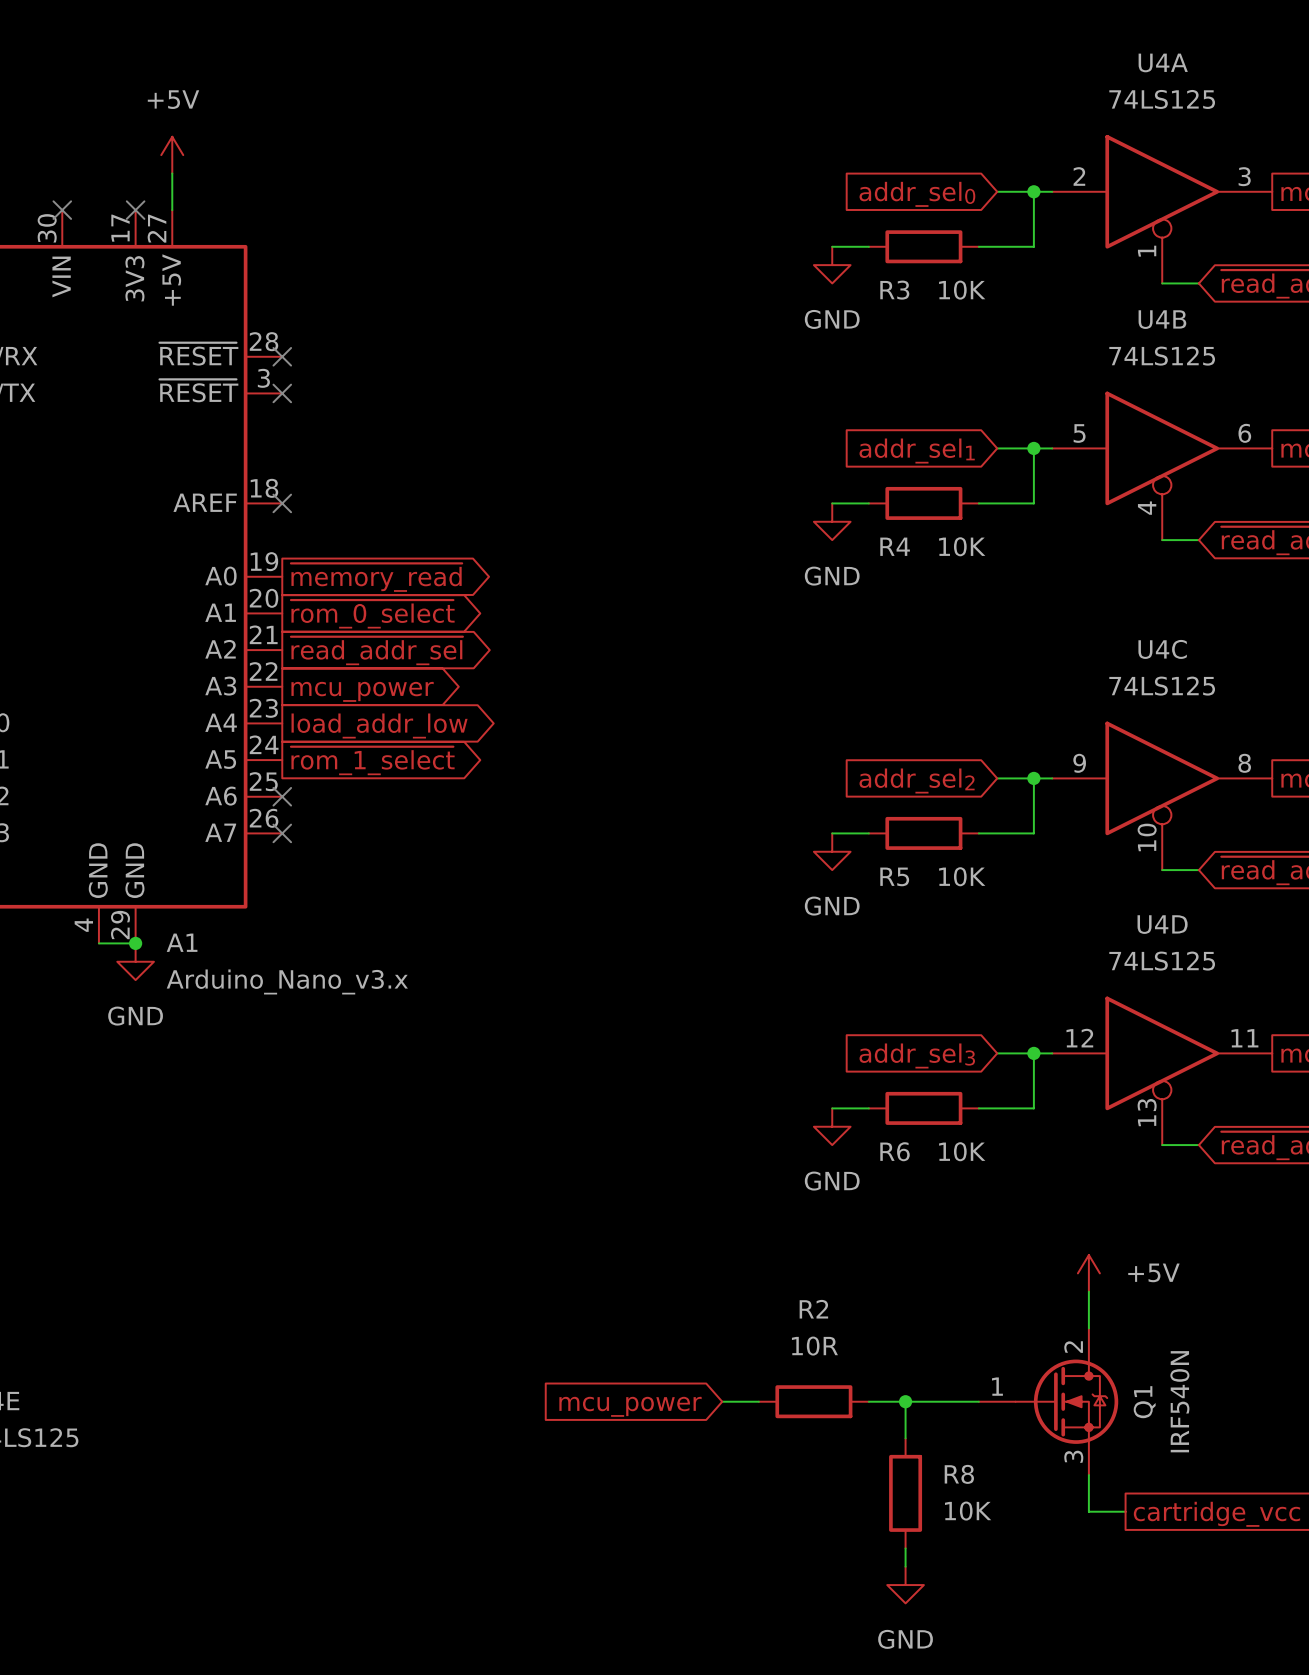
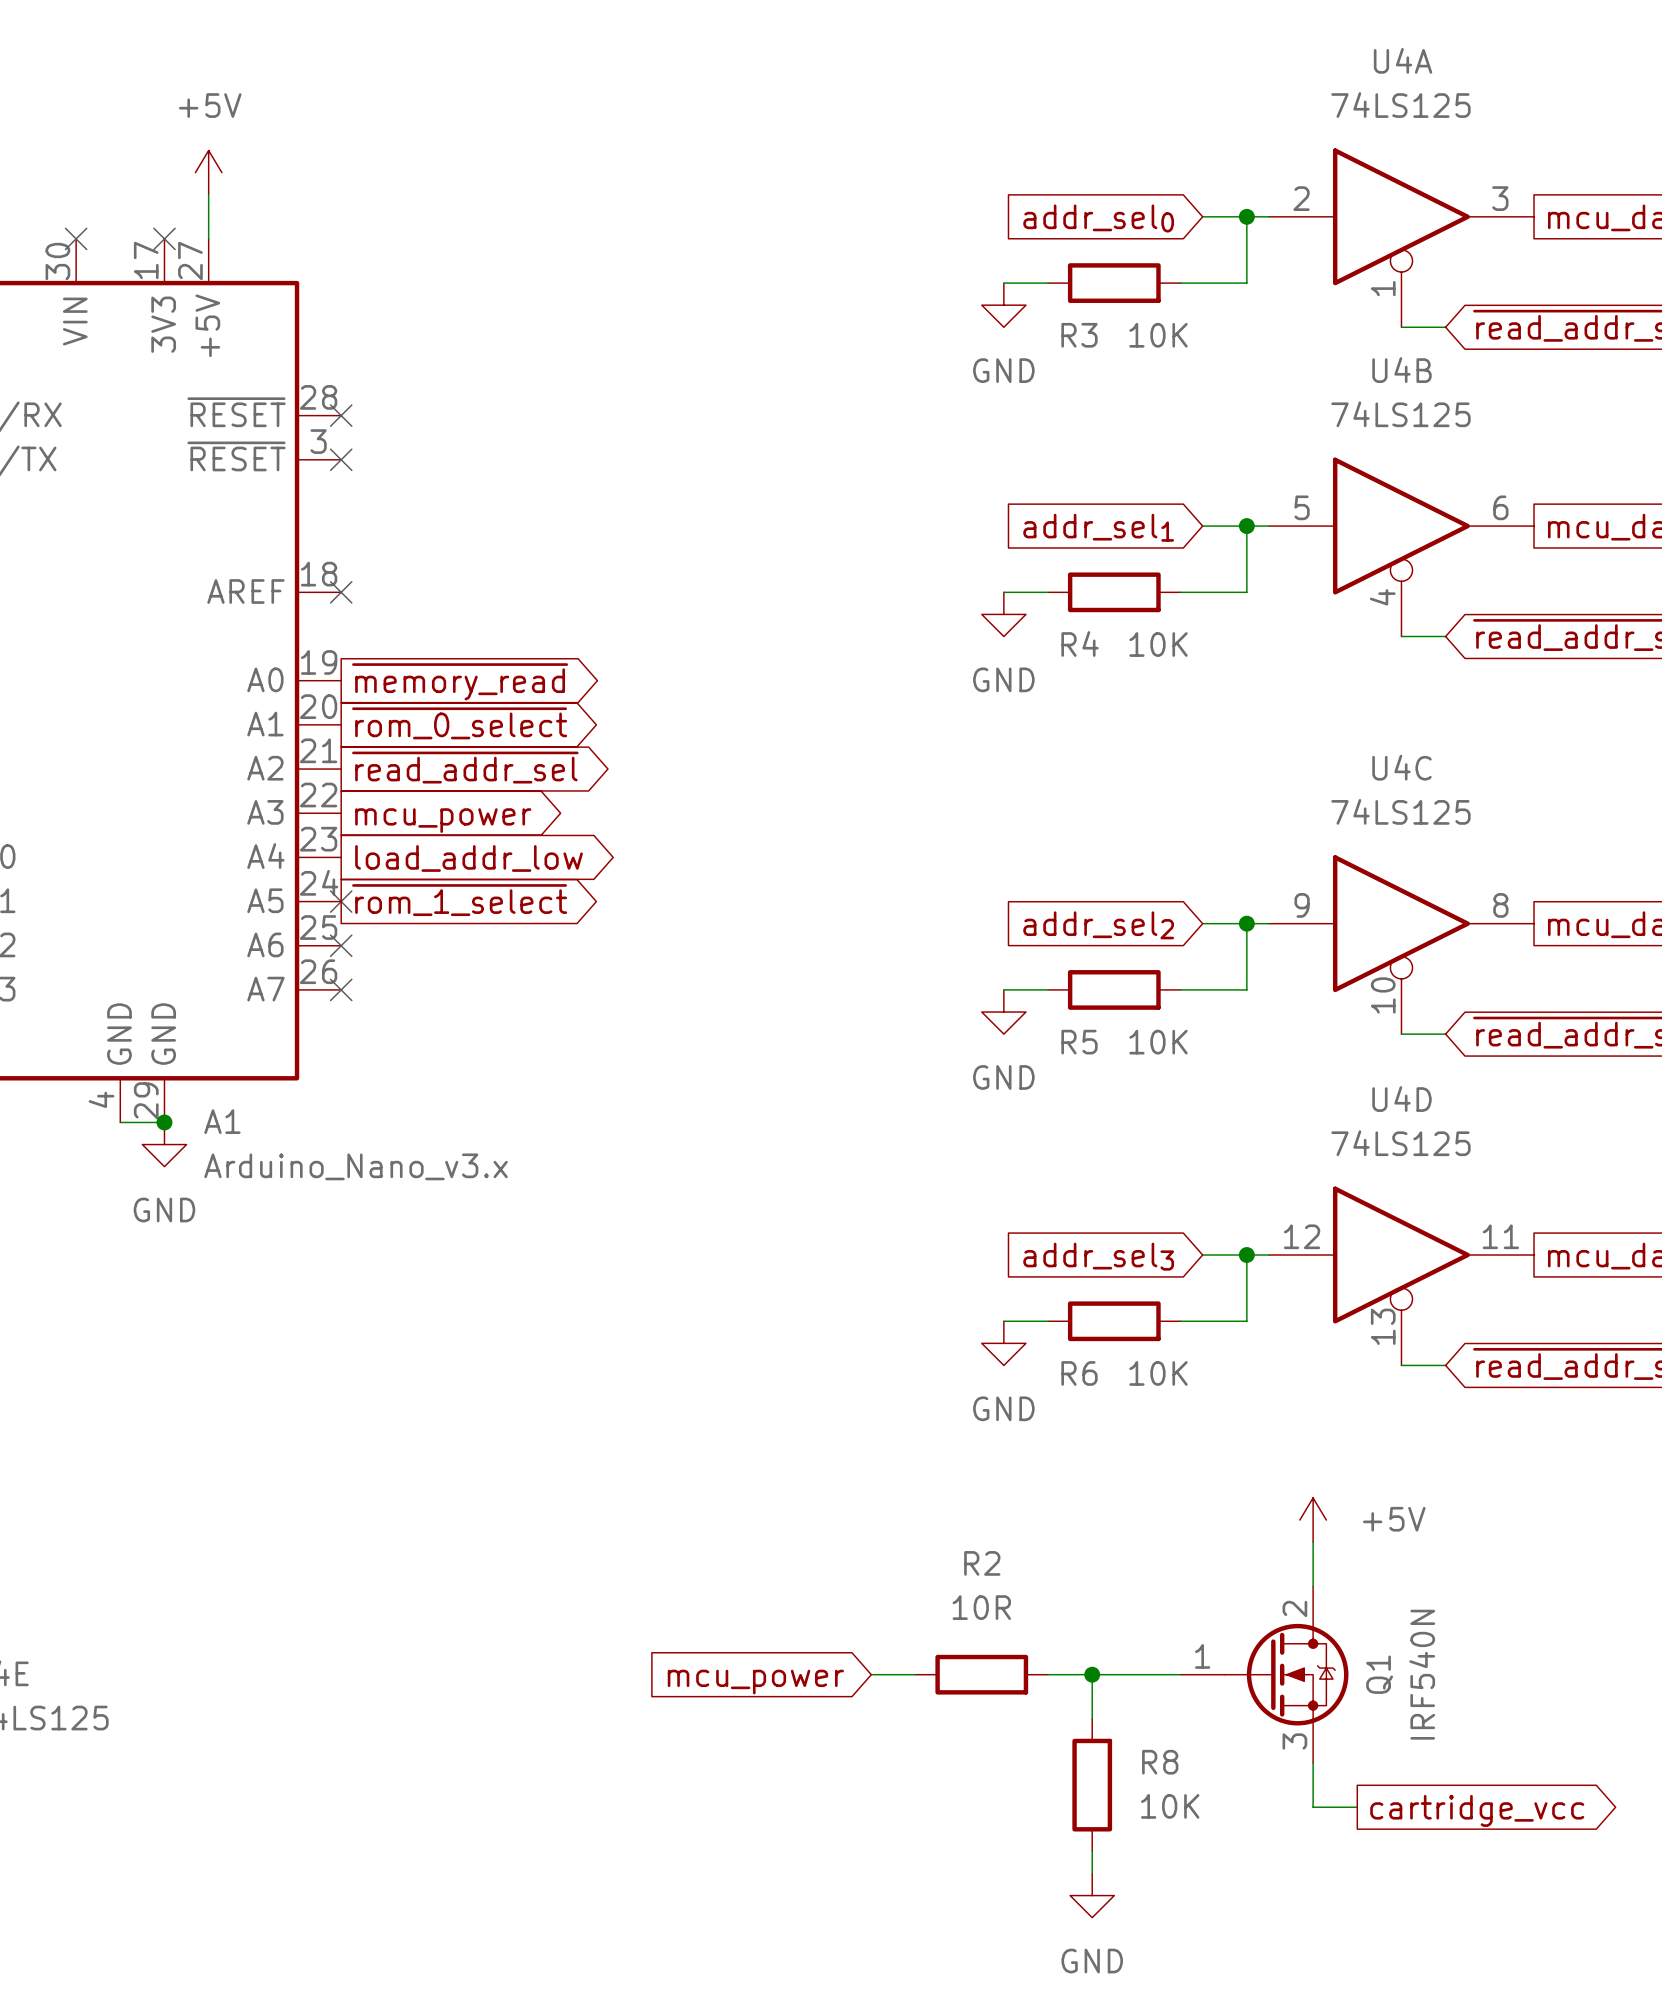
no-connect mark: none -> (341, 901)

